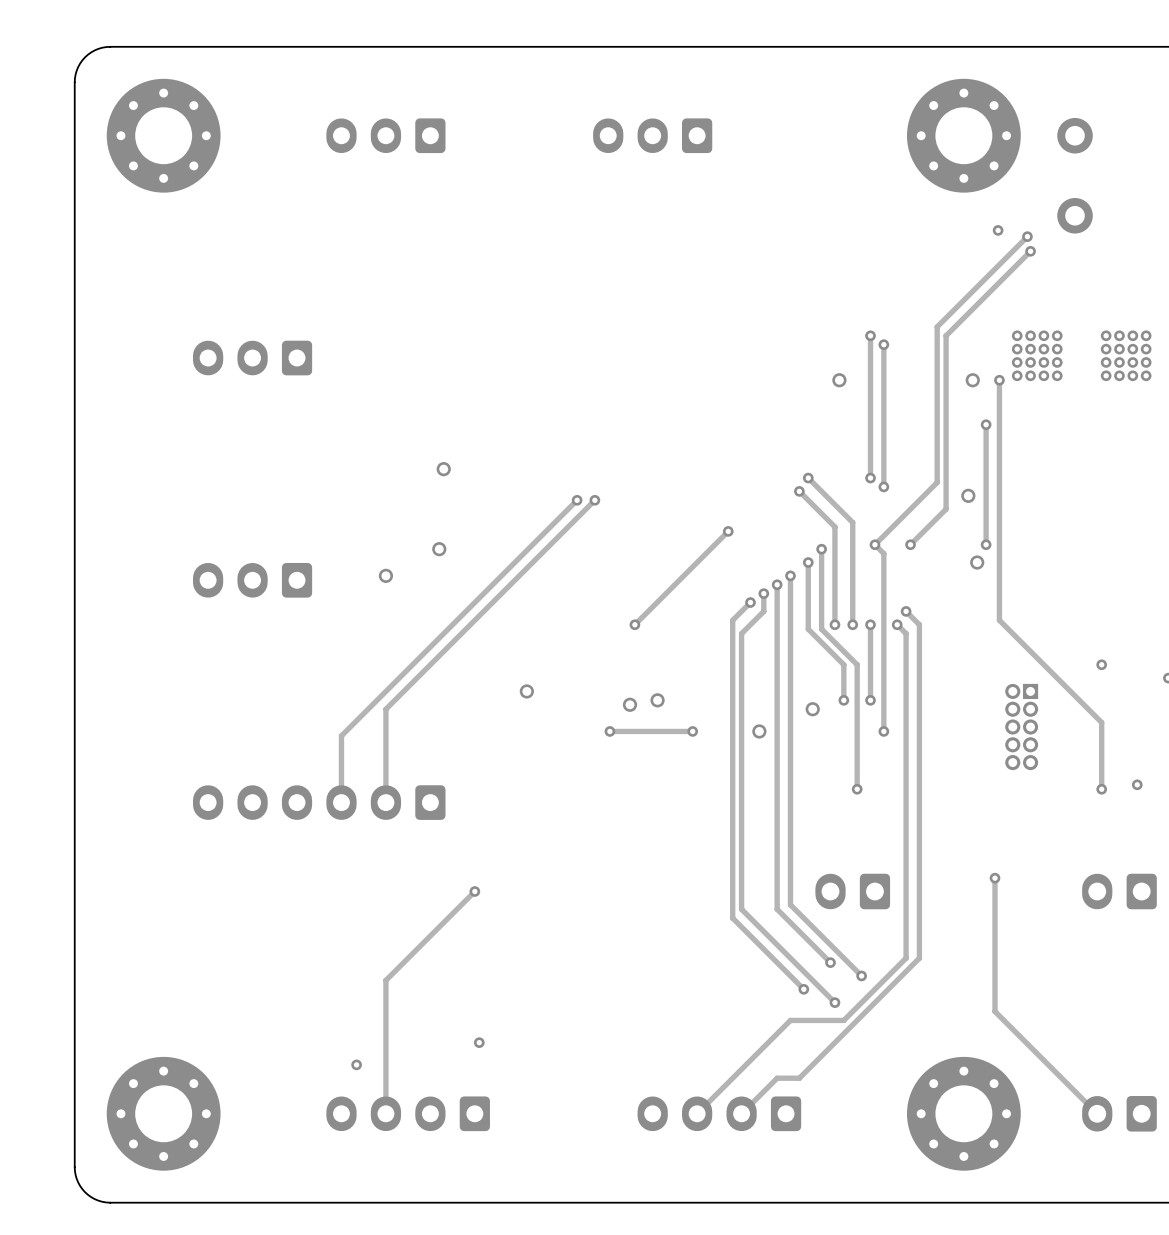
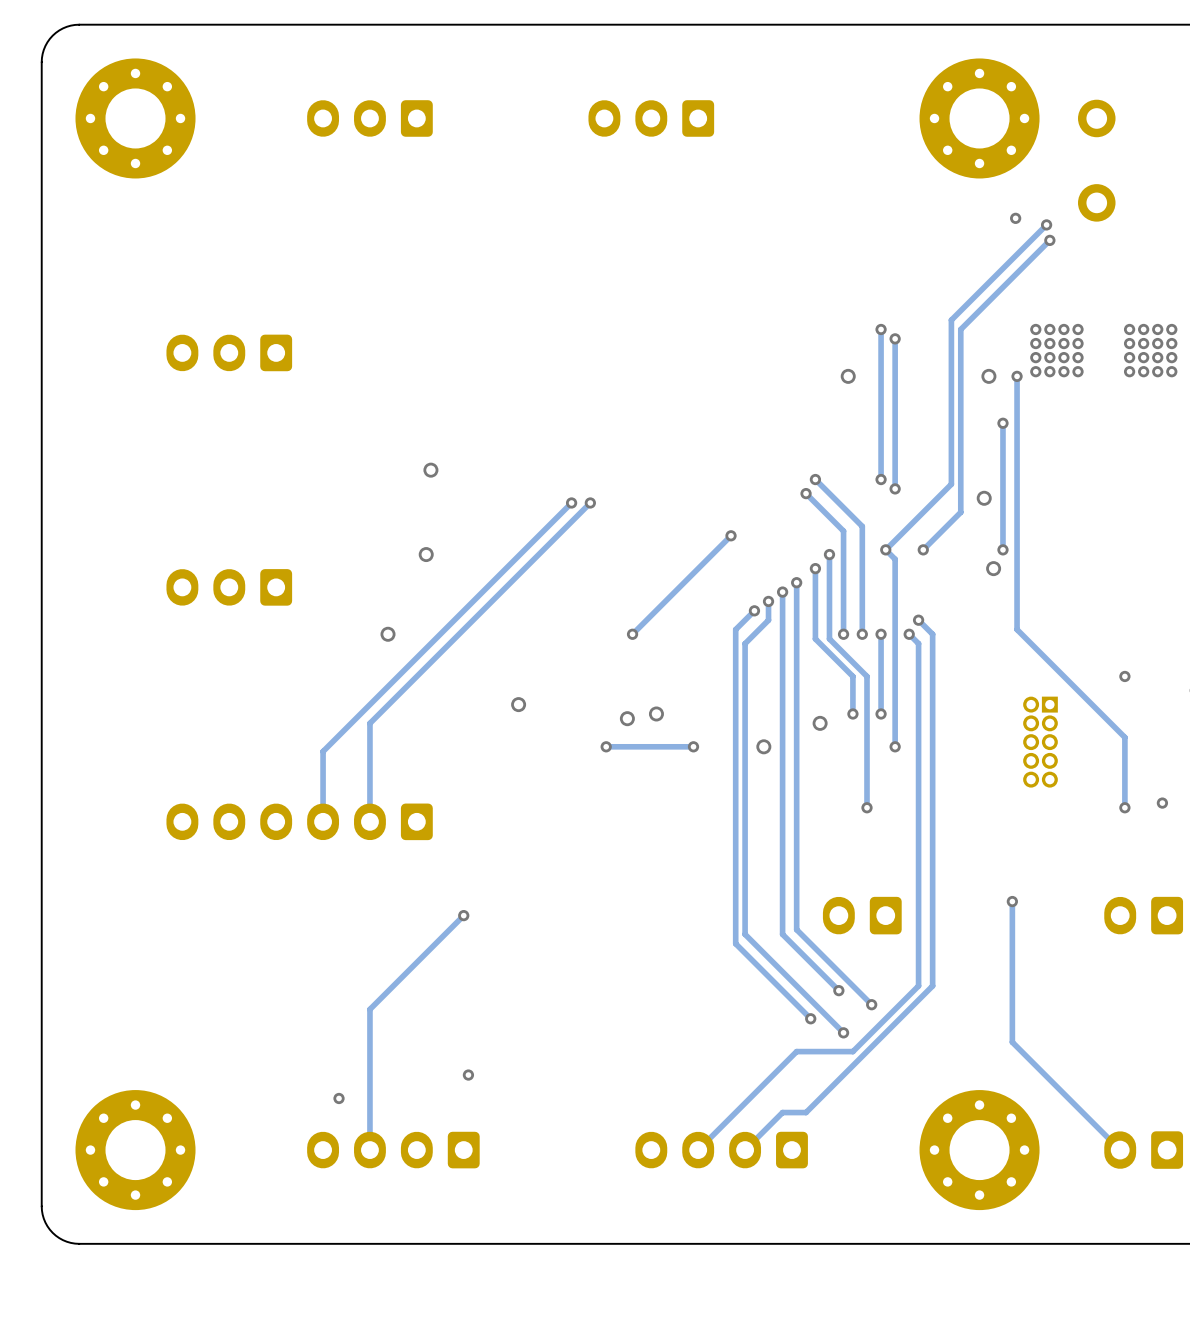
via position: (385, 575) -> (388, 634)

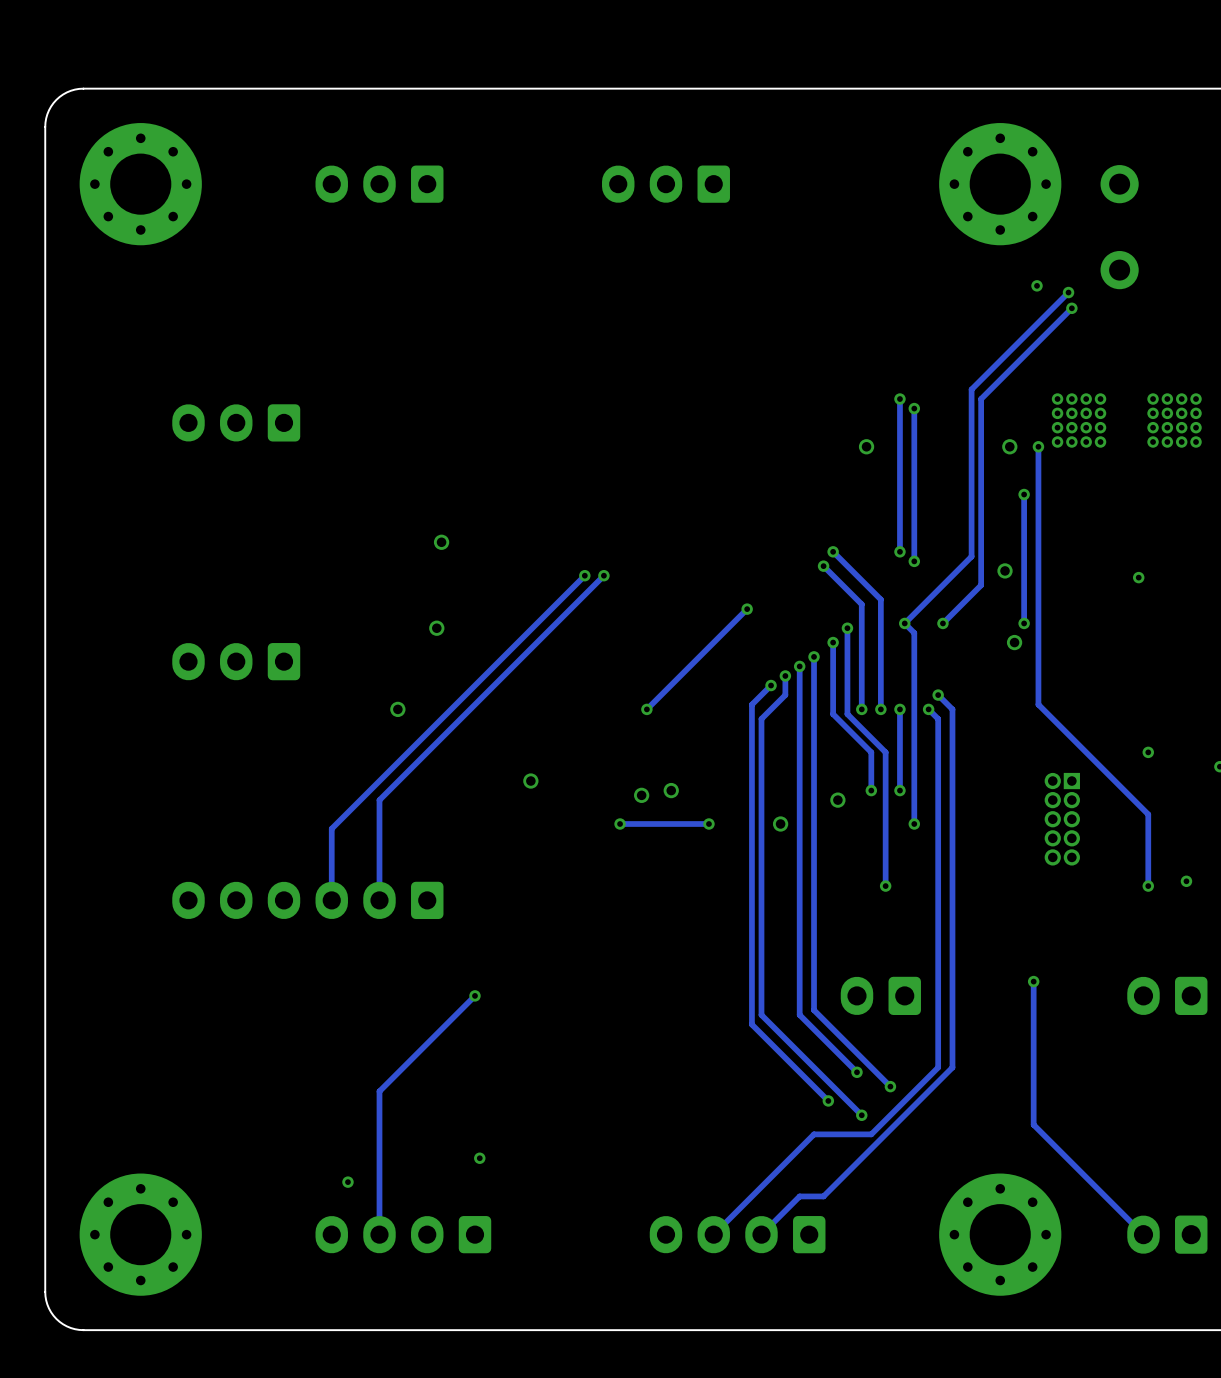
via: none -> (1138, 577)

